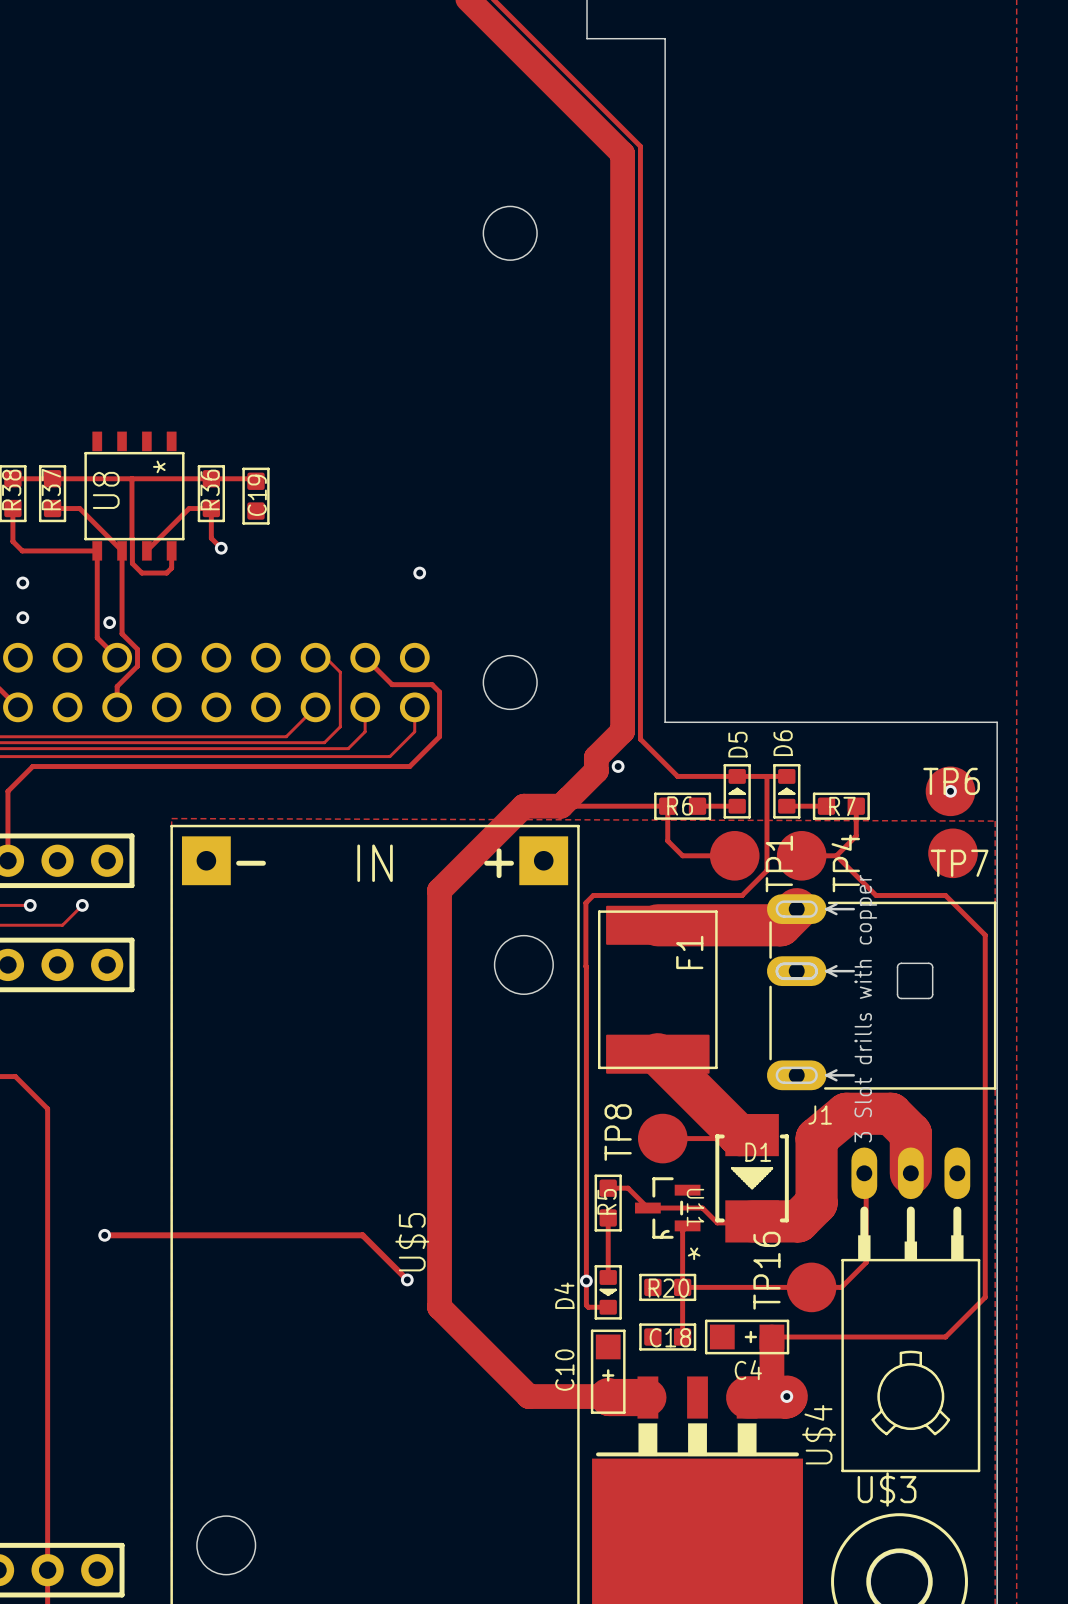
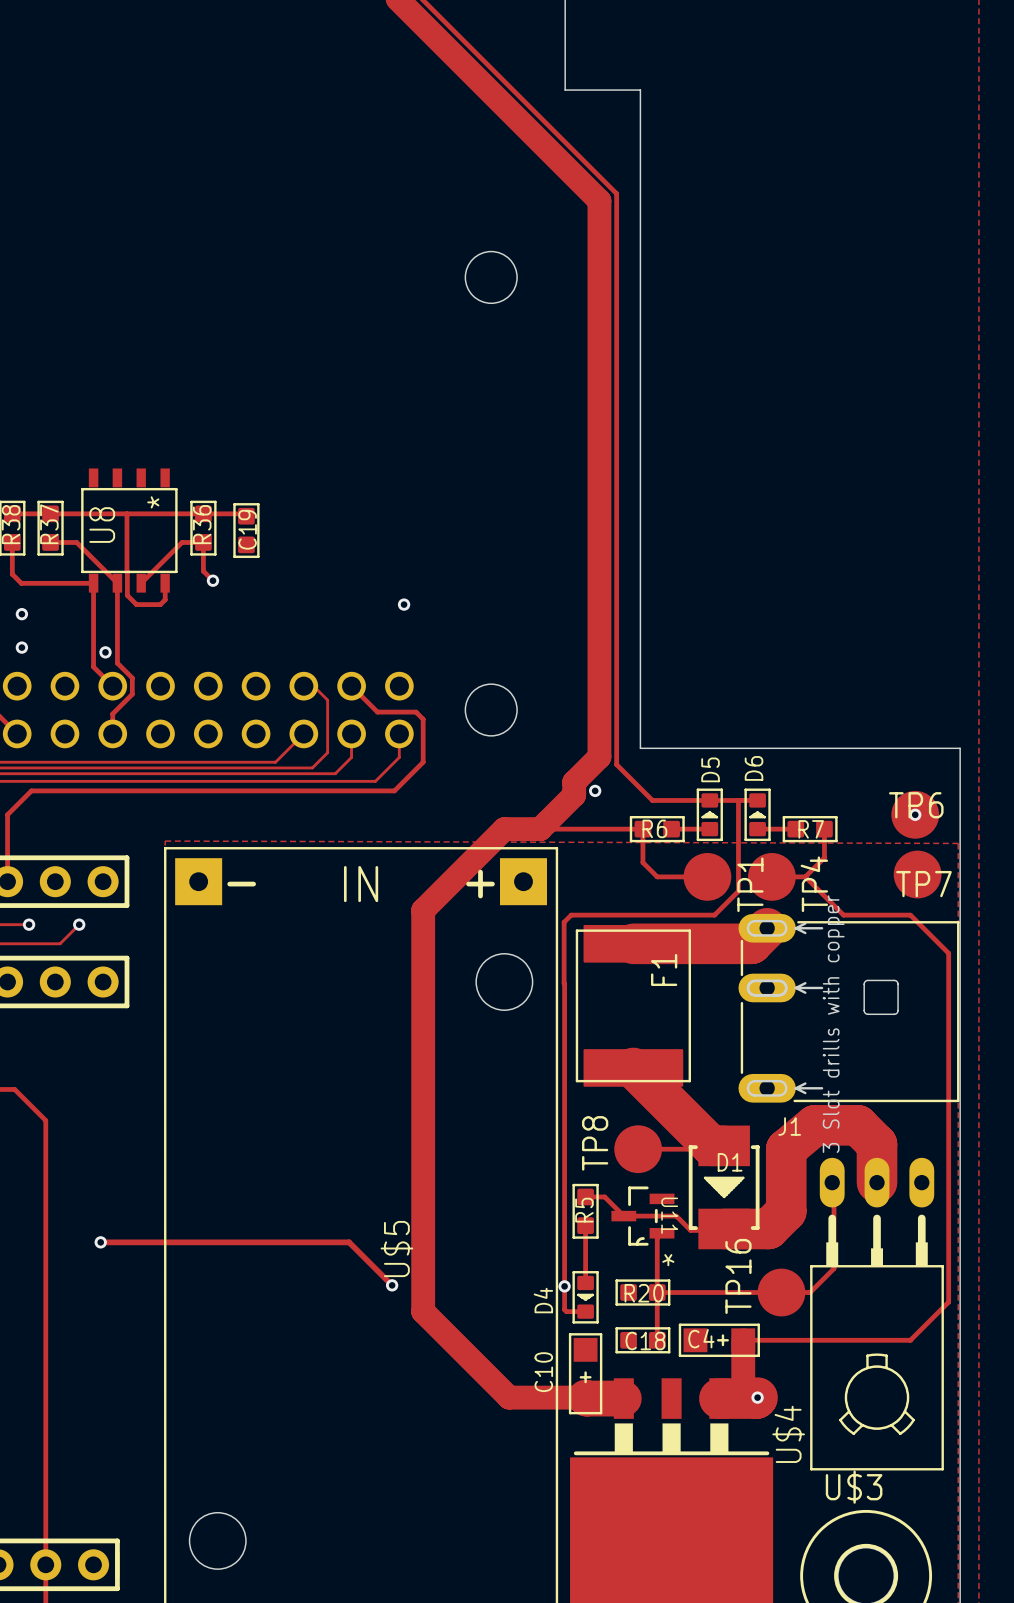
C4 name position: C4 (748, 1370) -> C4 (701, 1338)

